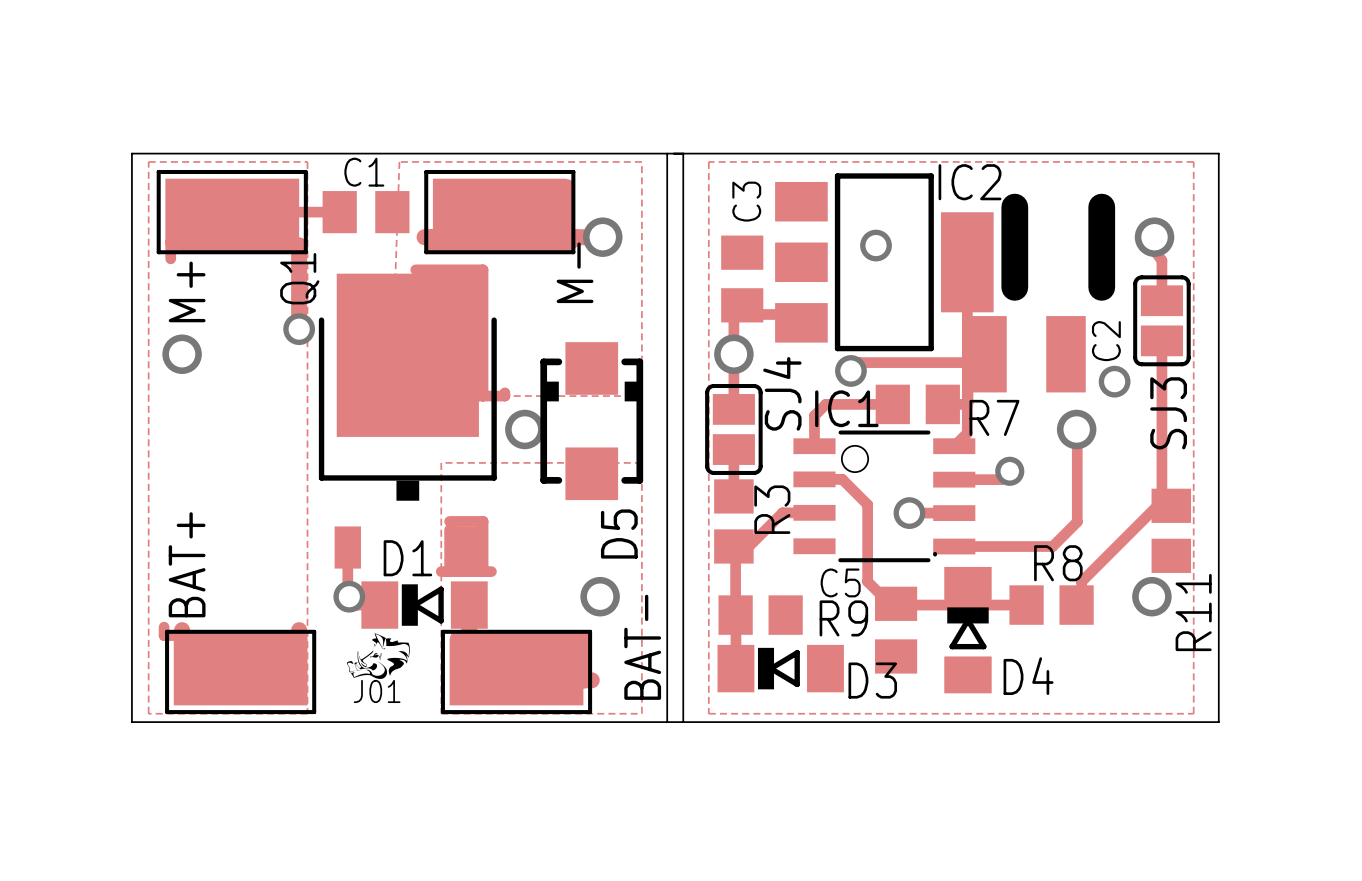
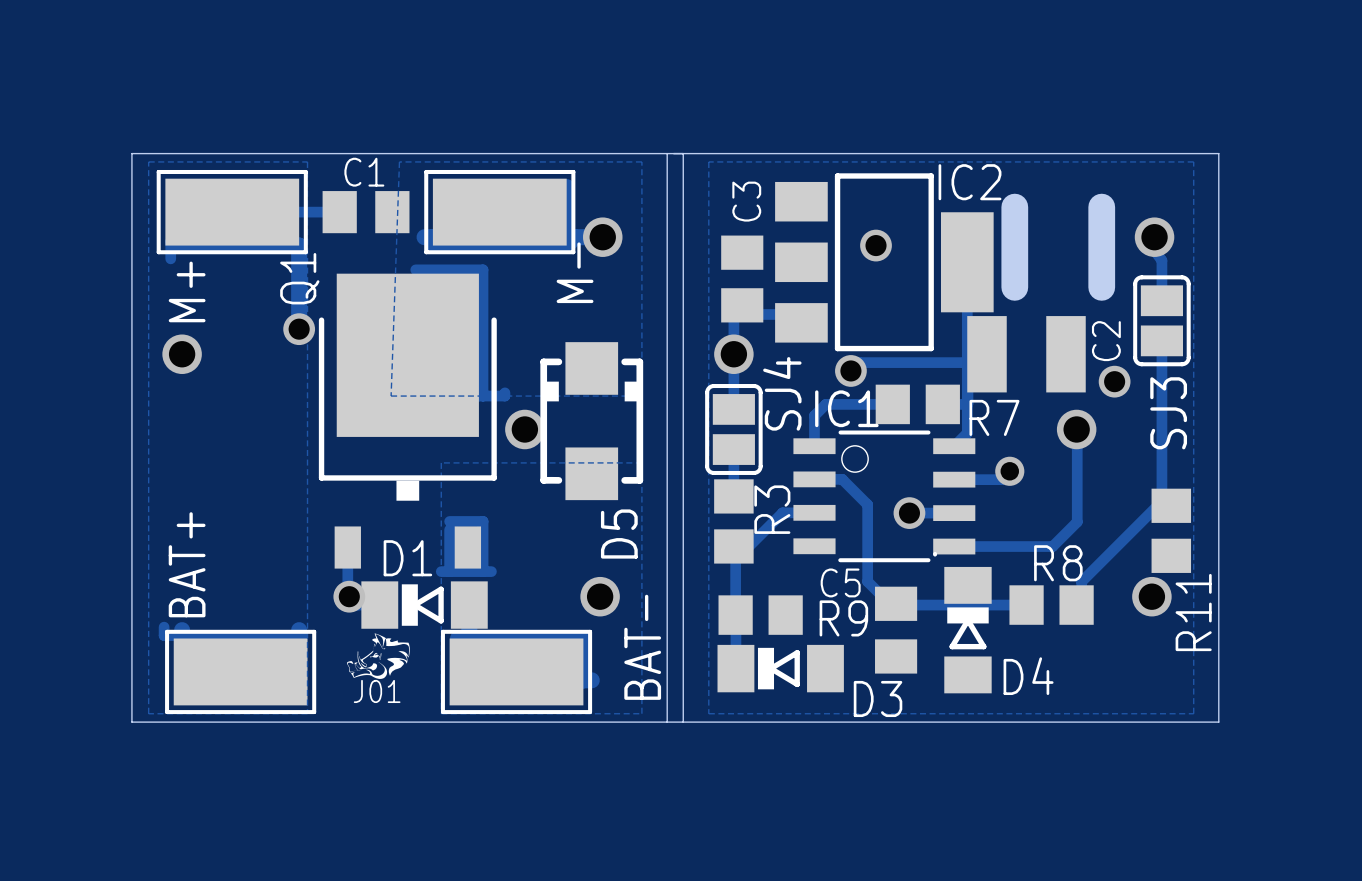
D3 name position: D3 (872, 680) -> D3 (878, 698)

